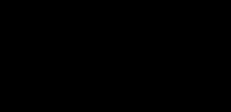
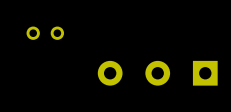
part: none -> (45, 33)
part: none -> (157, 73)

